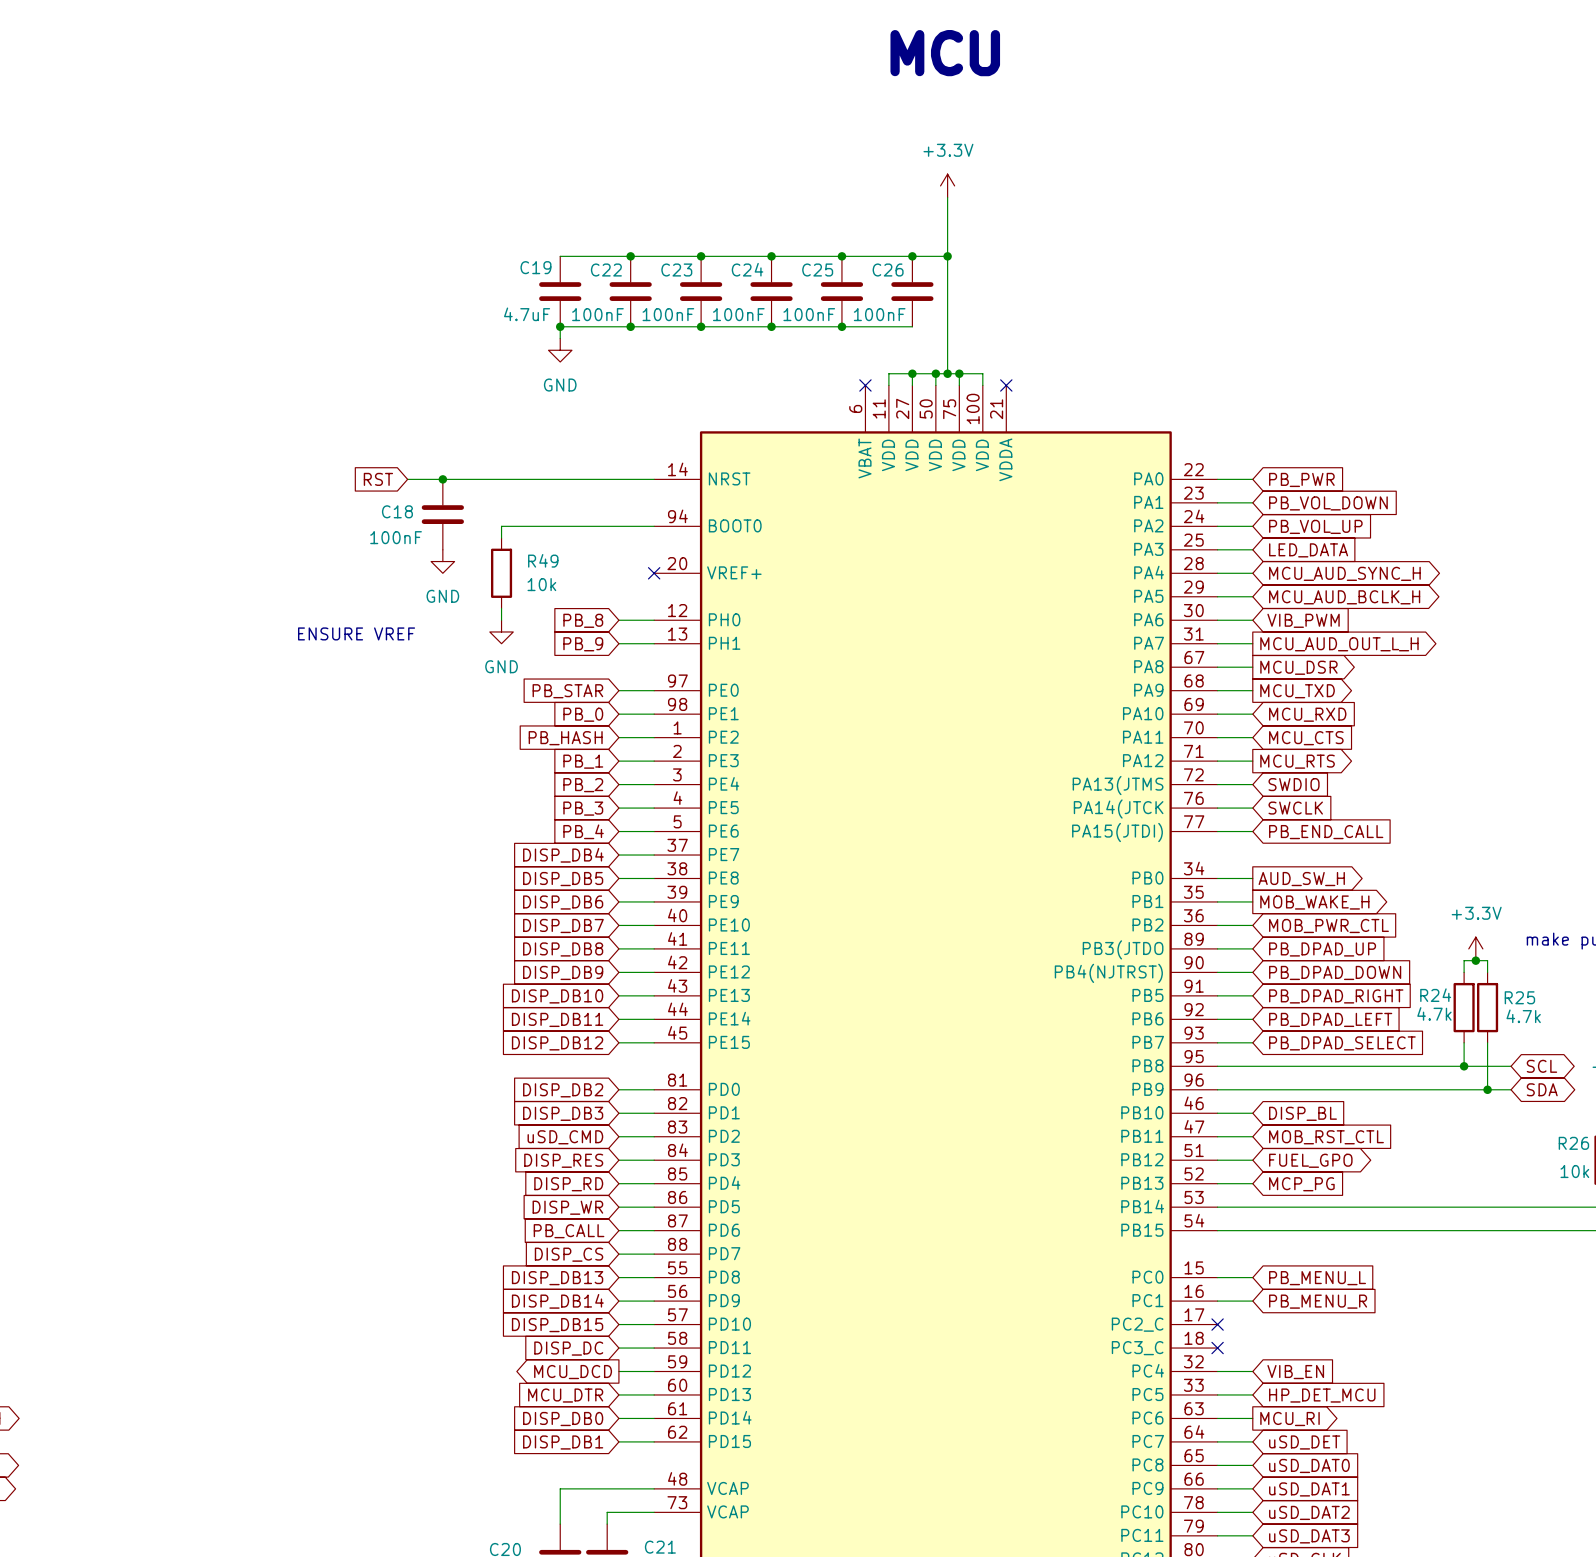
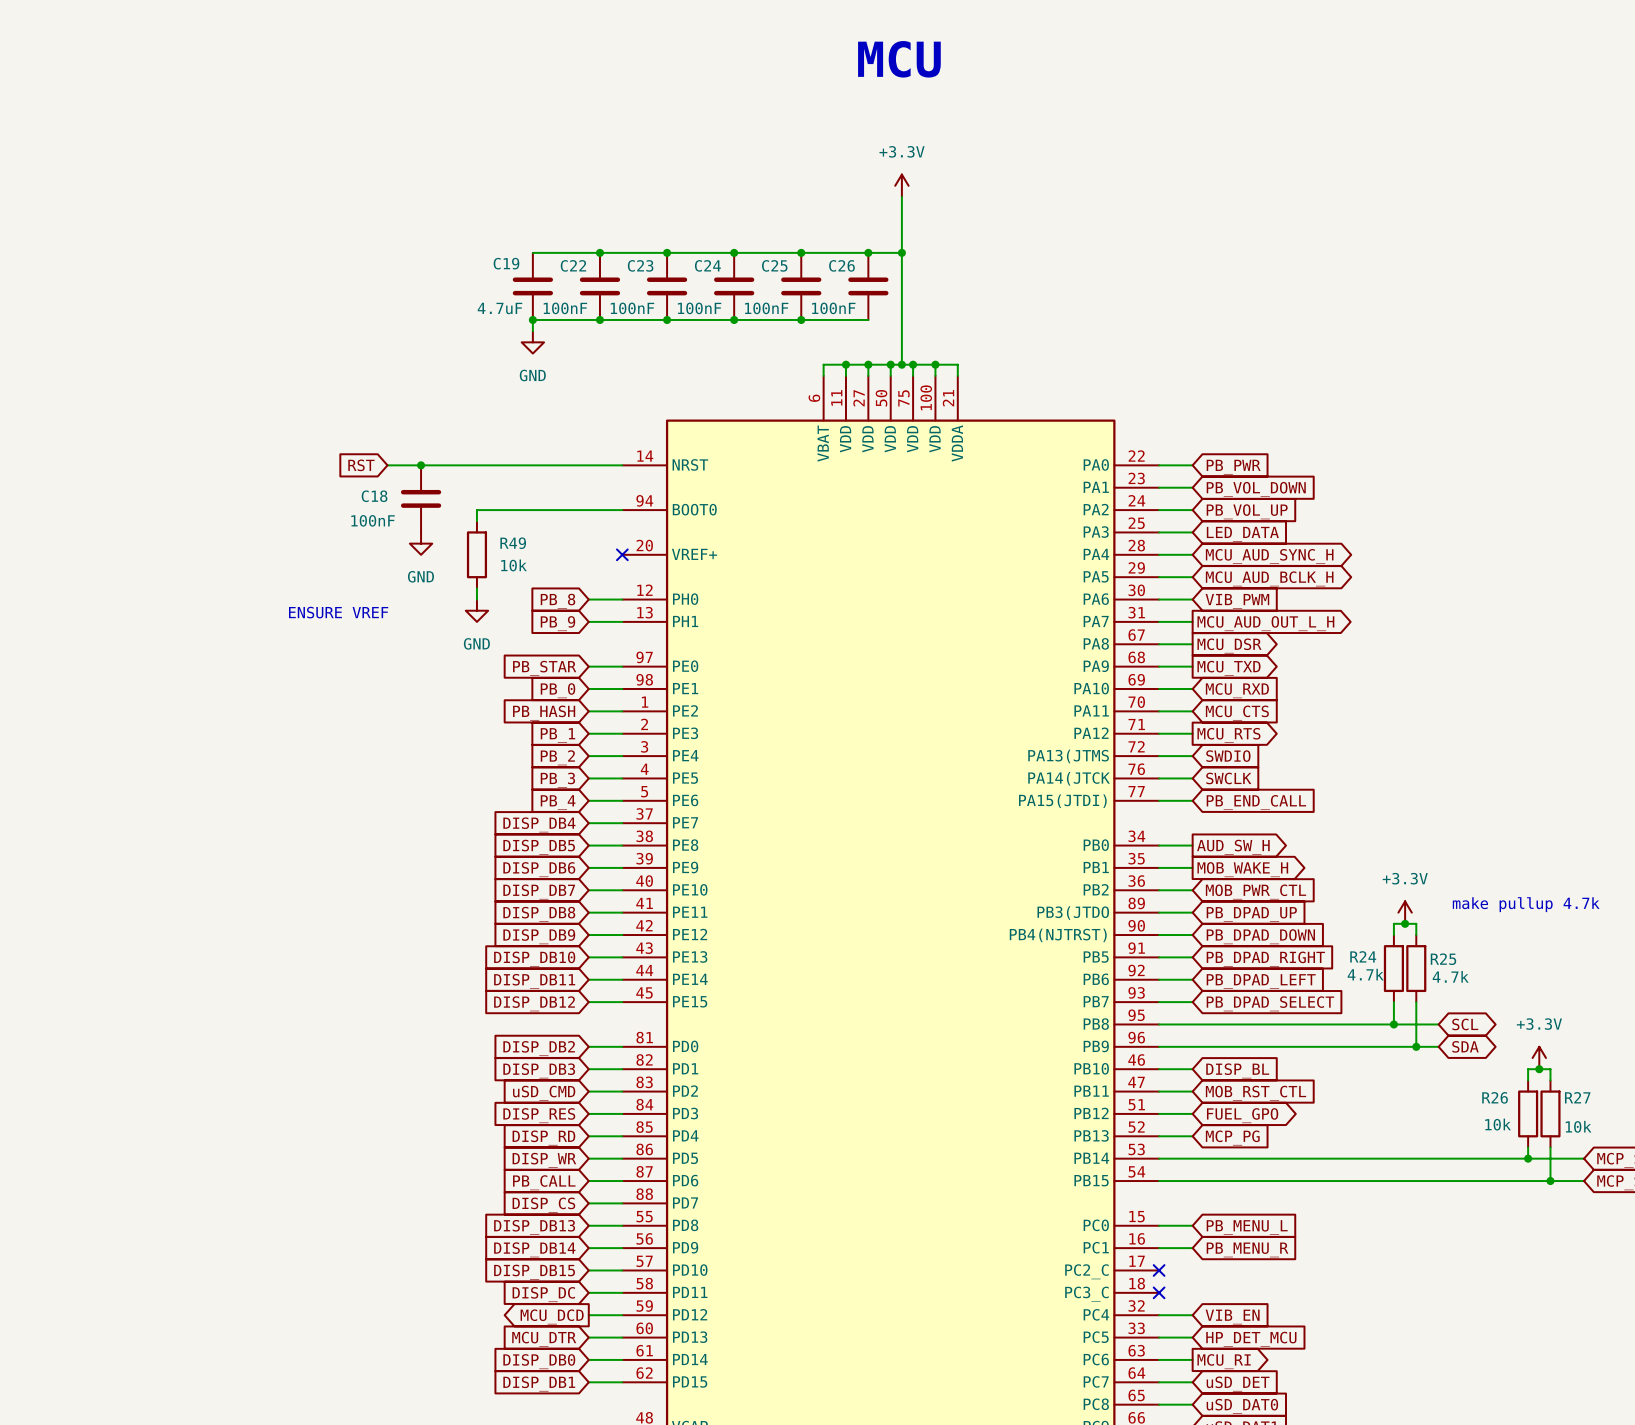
wire: none -> (845, 364) (823, 364) (823, 375)
junction: none -> (845, 364)
wire: none -> (935, 364) (957, 364) (957, 375)
junction: none -> (935, 364)
no-connect mark: (865, 385) -> none
no-connect mark: (1006, 385) -> none

